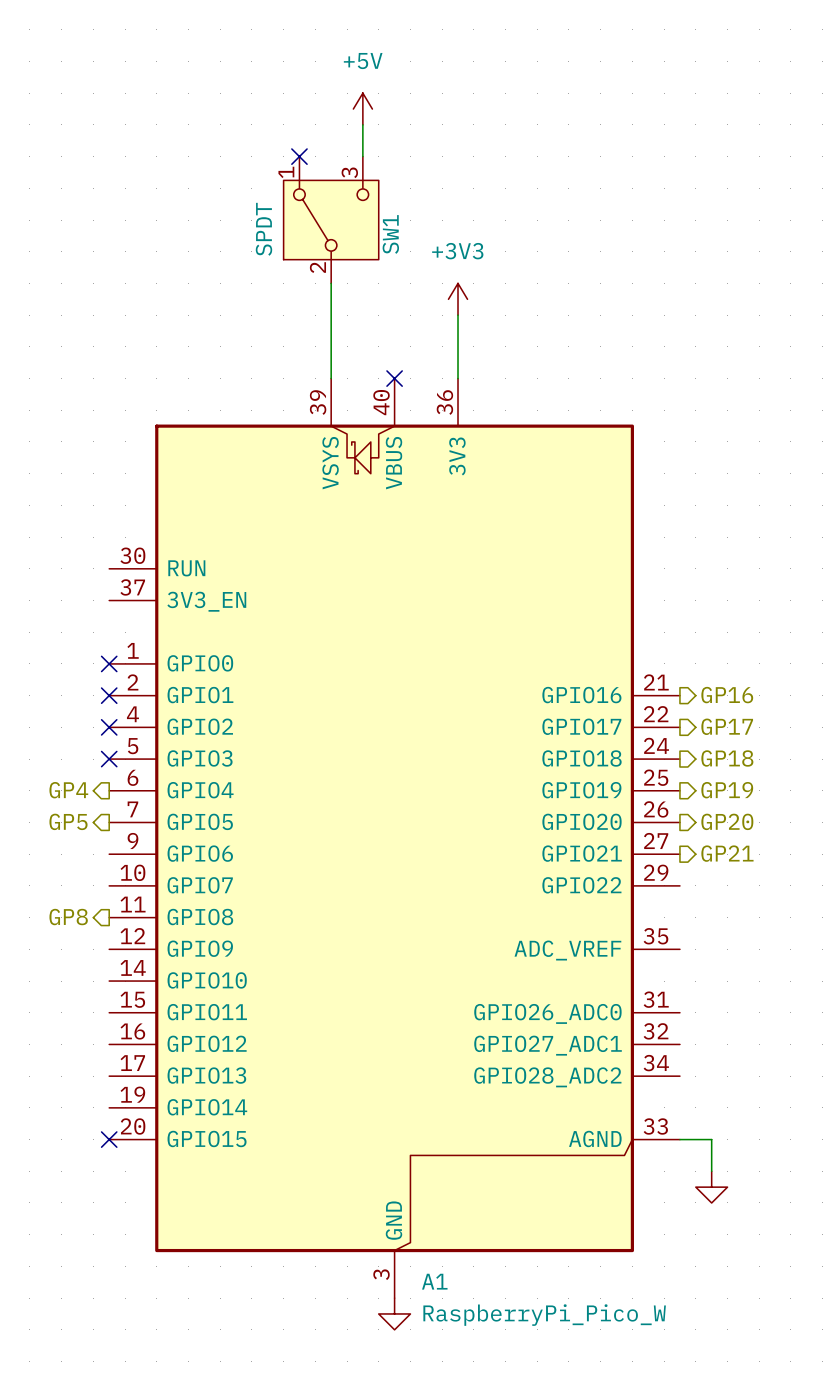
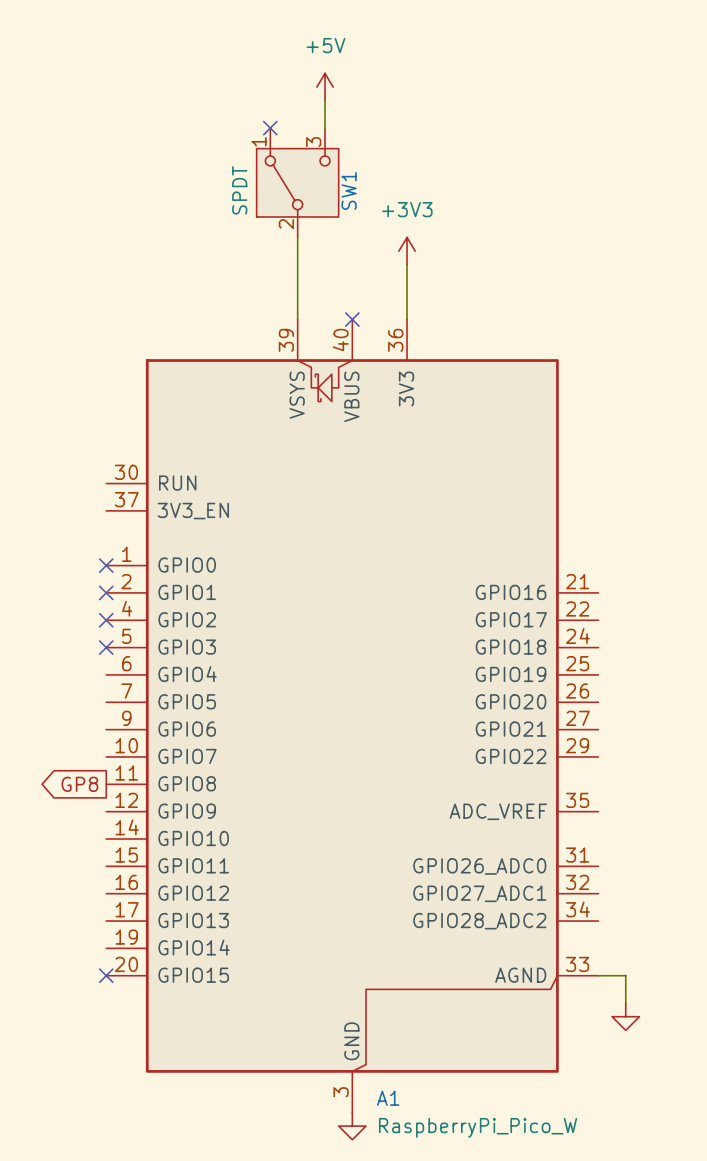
hierarchical label: GP16 (727, 695) -> none
hierarchical label: GP17 (727, 726) -> none
hierarchical label: GP18 (727, 758) -> none
hierarchical label: GP4 (68, 790) -> none
hierarchical label: GP19 (727, 790) -> none
hierarchical label: GP5 (68, 821) -> none
hierarchical label: GP20 (727, 821) -> none
hierarchical label: GP21 (727, 853) -> none
hierarchical label: GP8 (68, 917) -> none
global label: none -> GP8 (79, 784)

